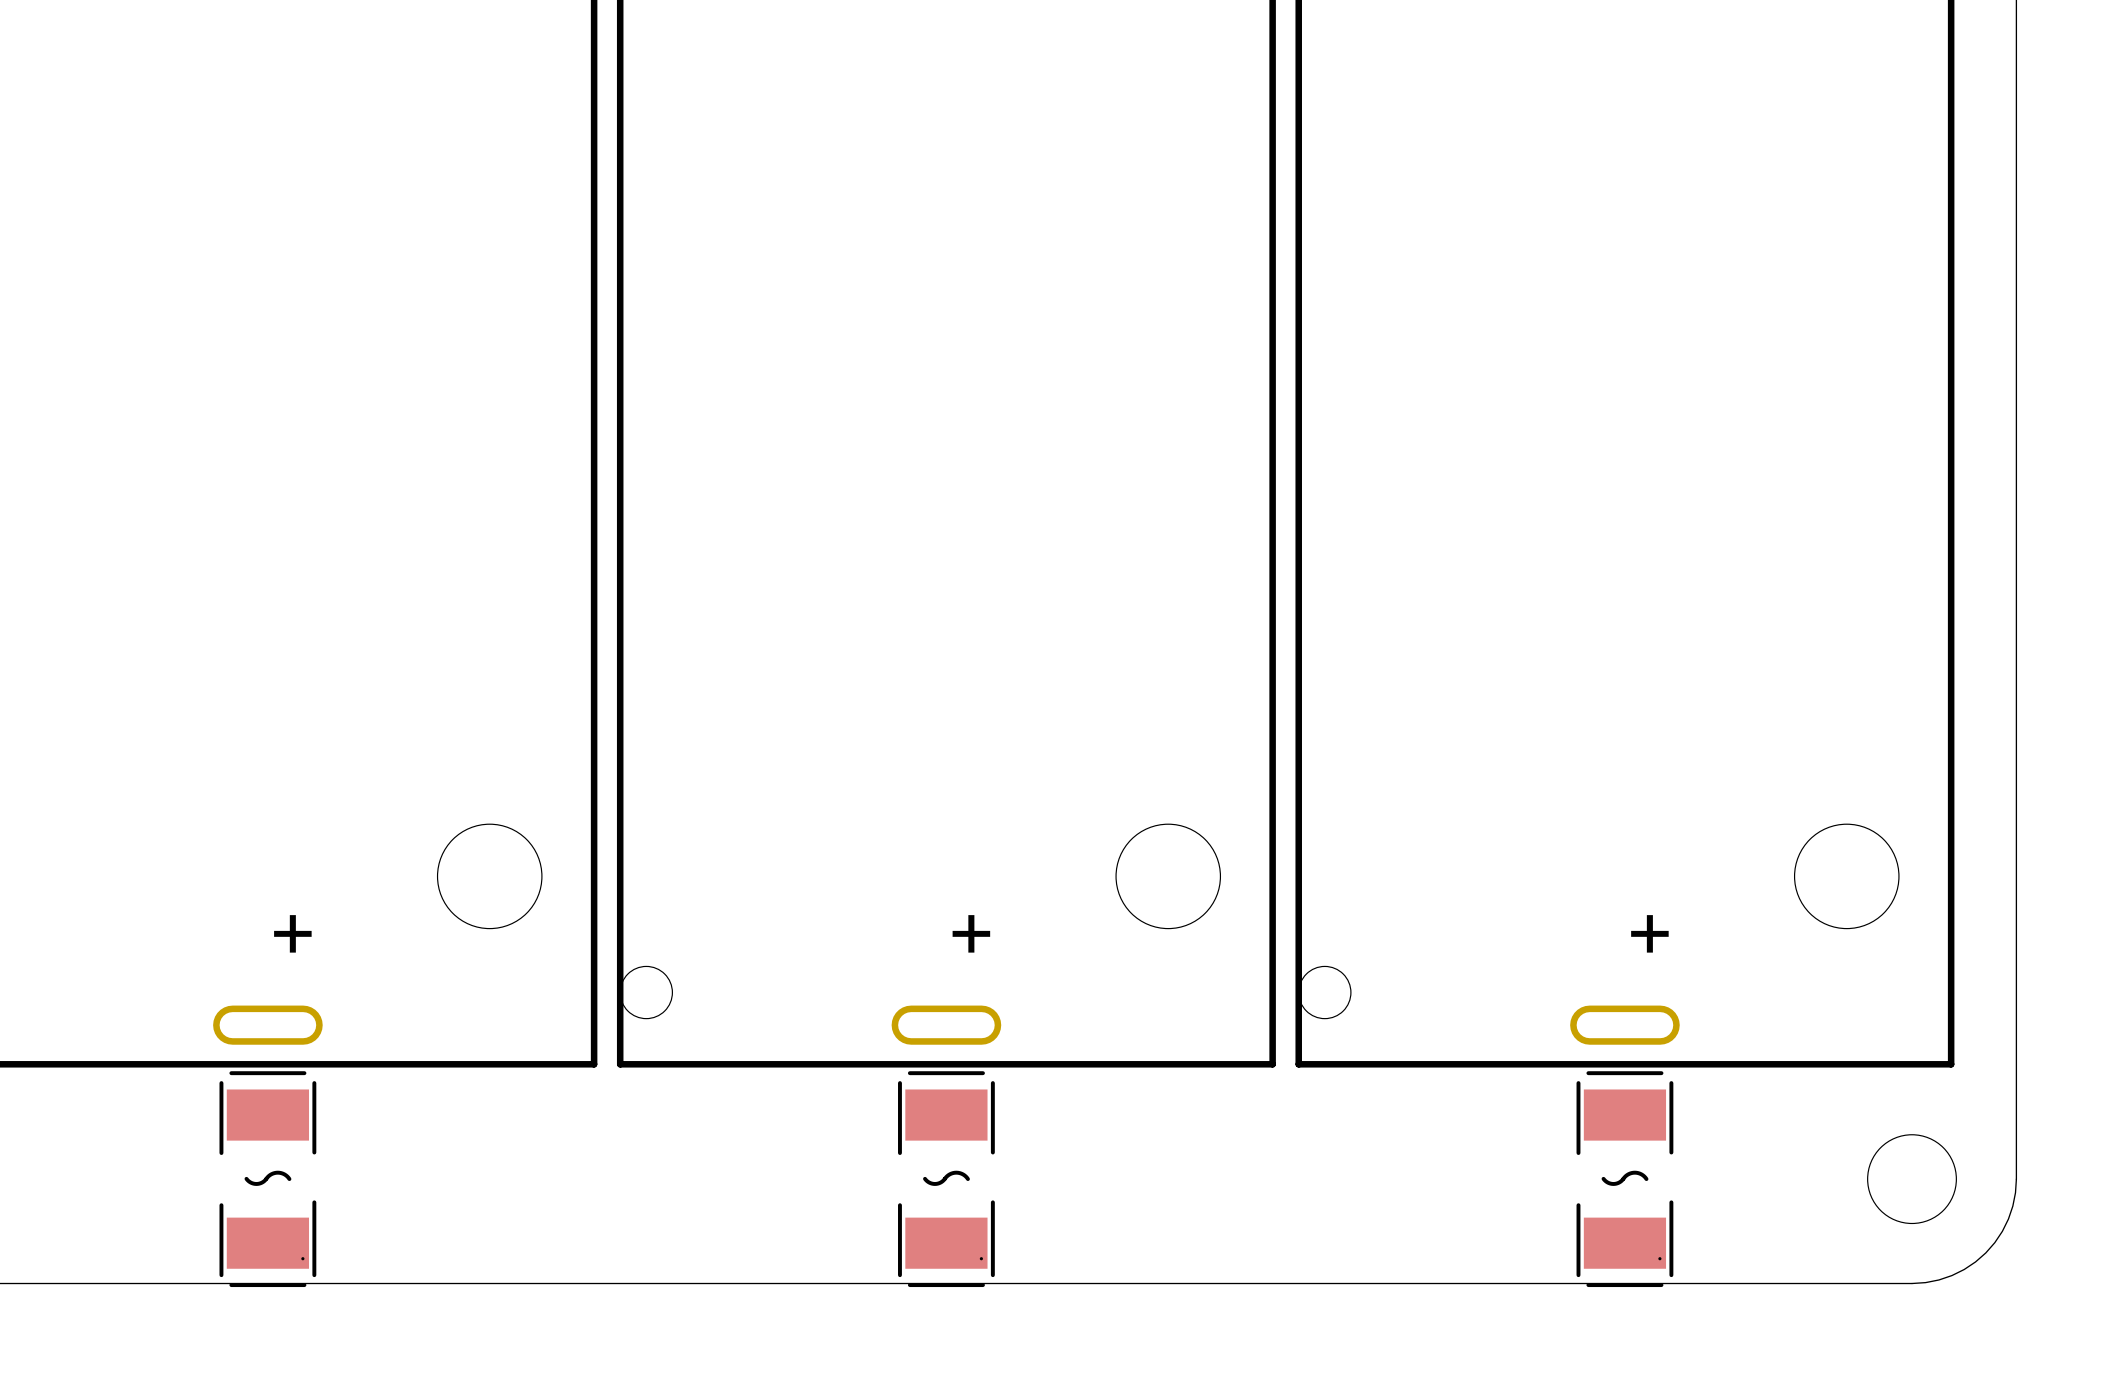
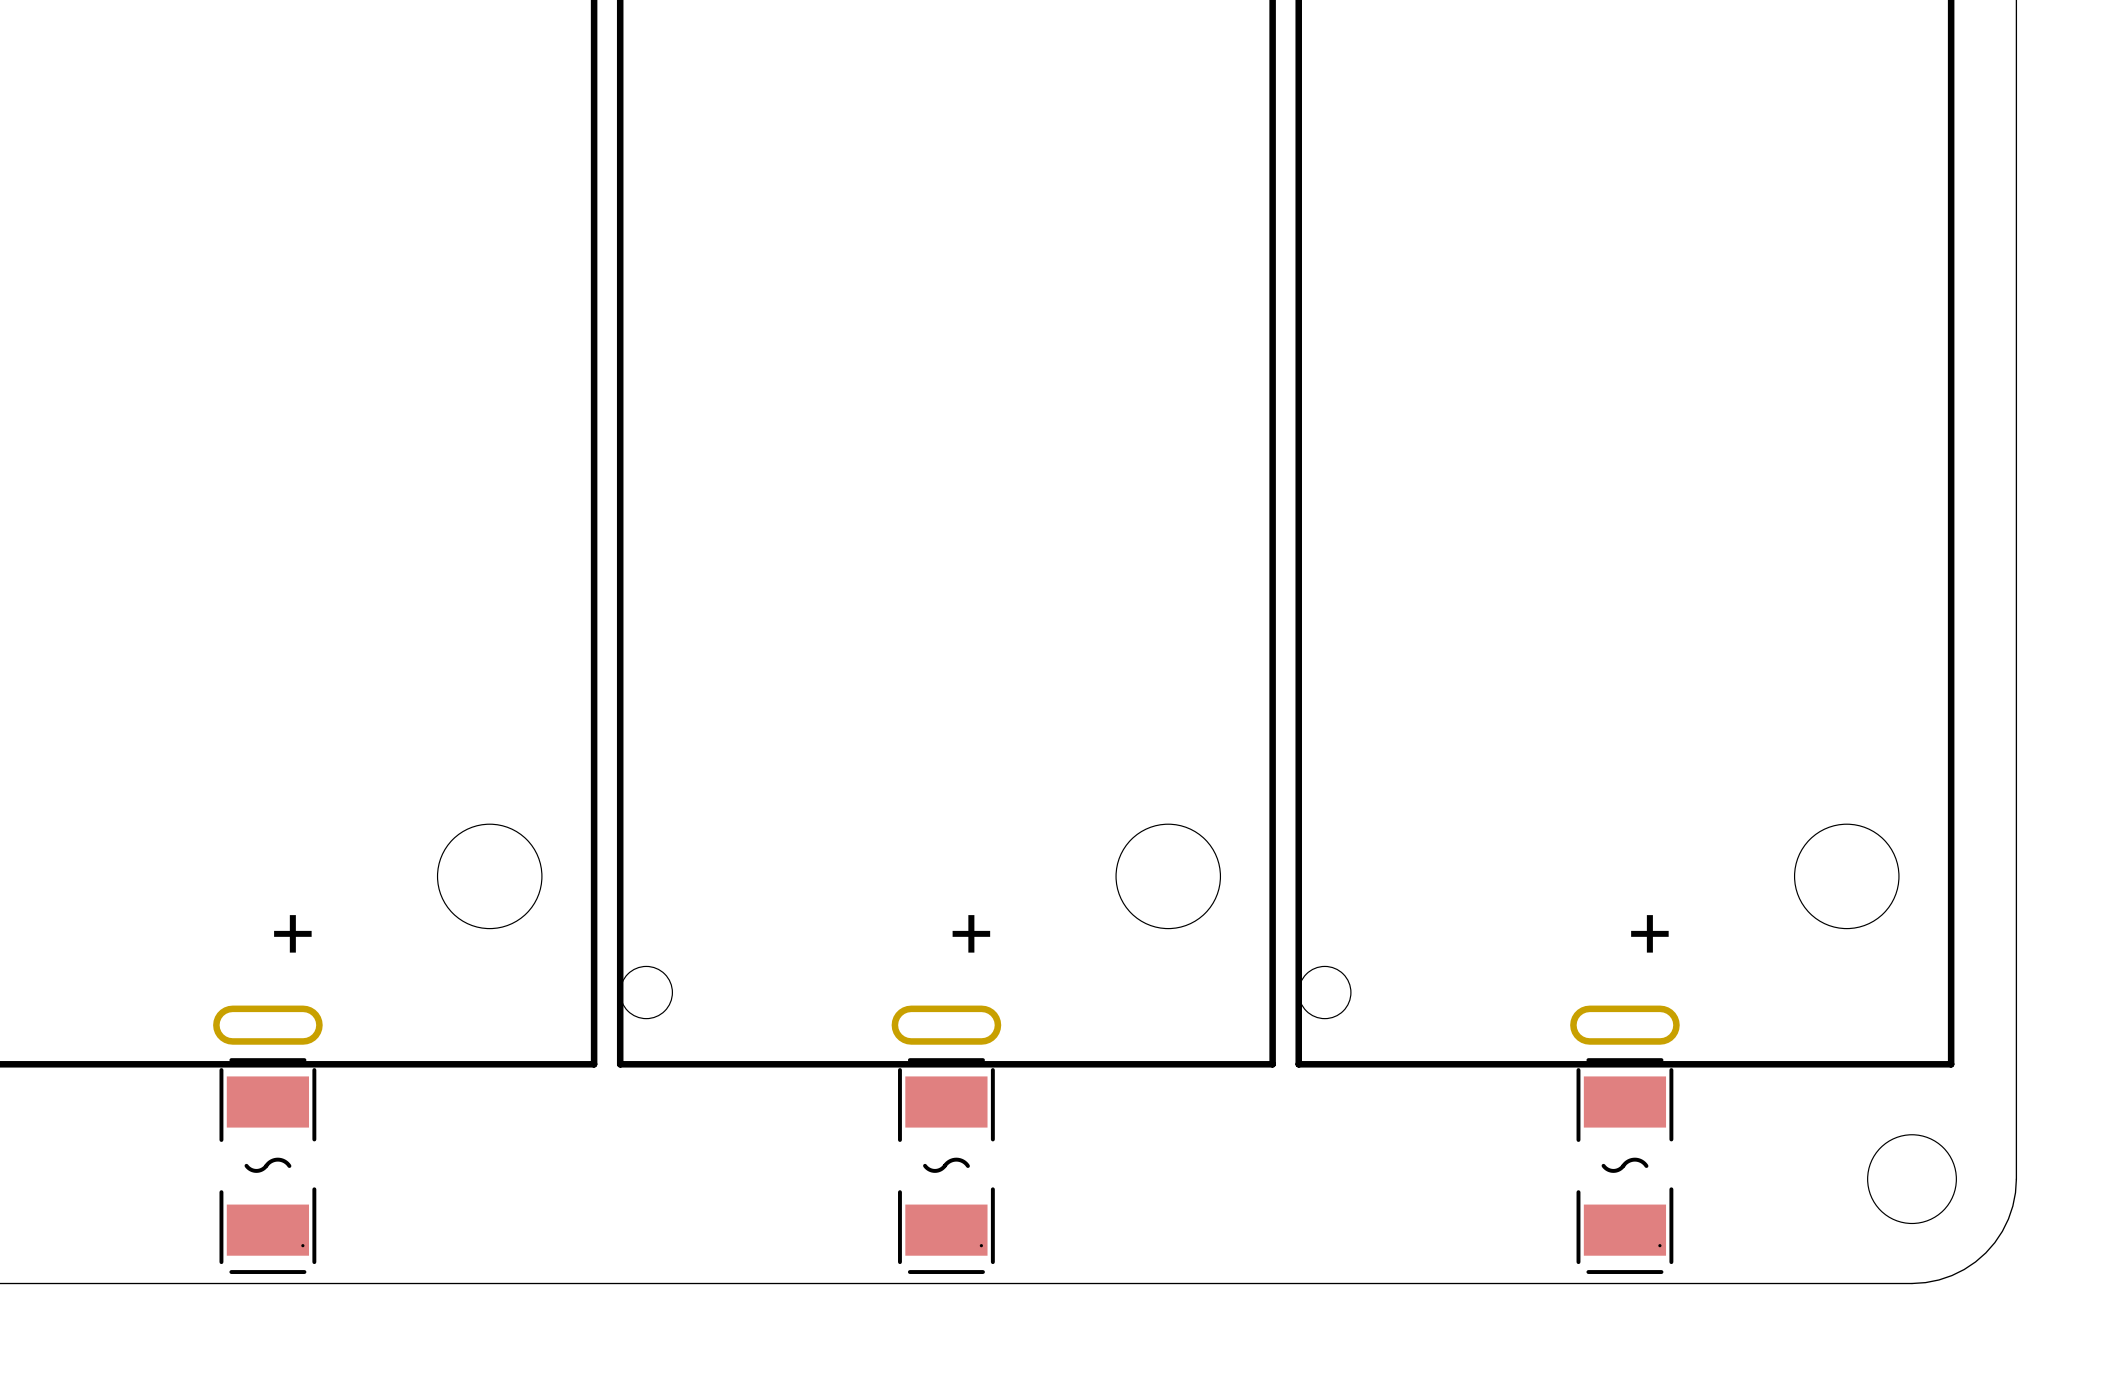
part position: (267, 1179) -> (267, 1166)
part position: (946, 1179) -> (946, 1166)
part position: (1624, 1179) -> (1624, 1166)

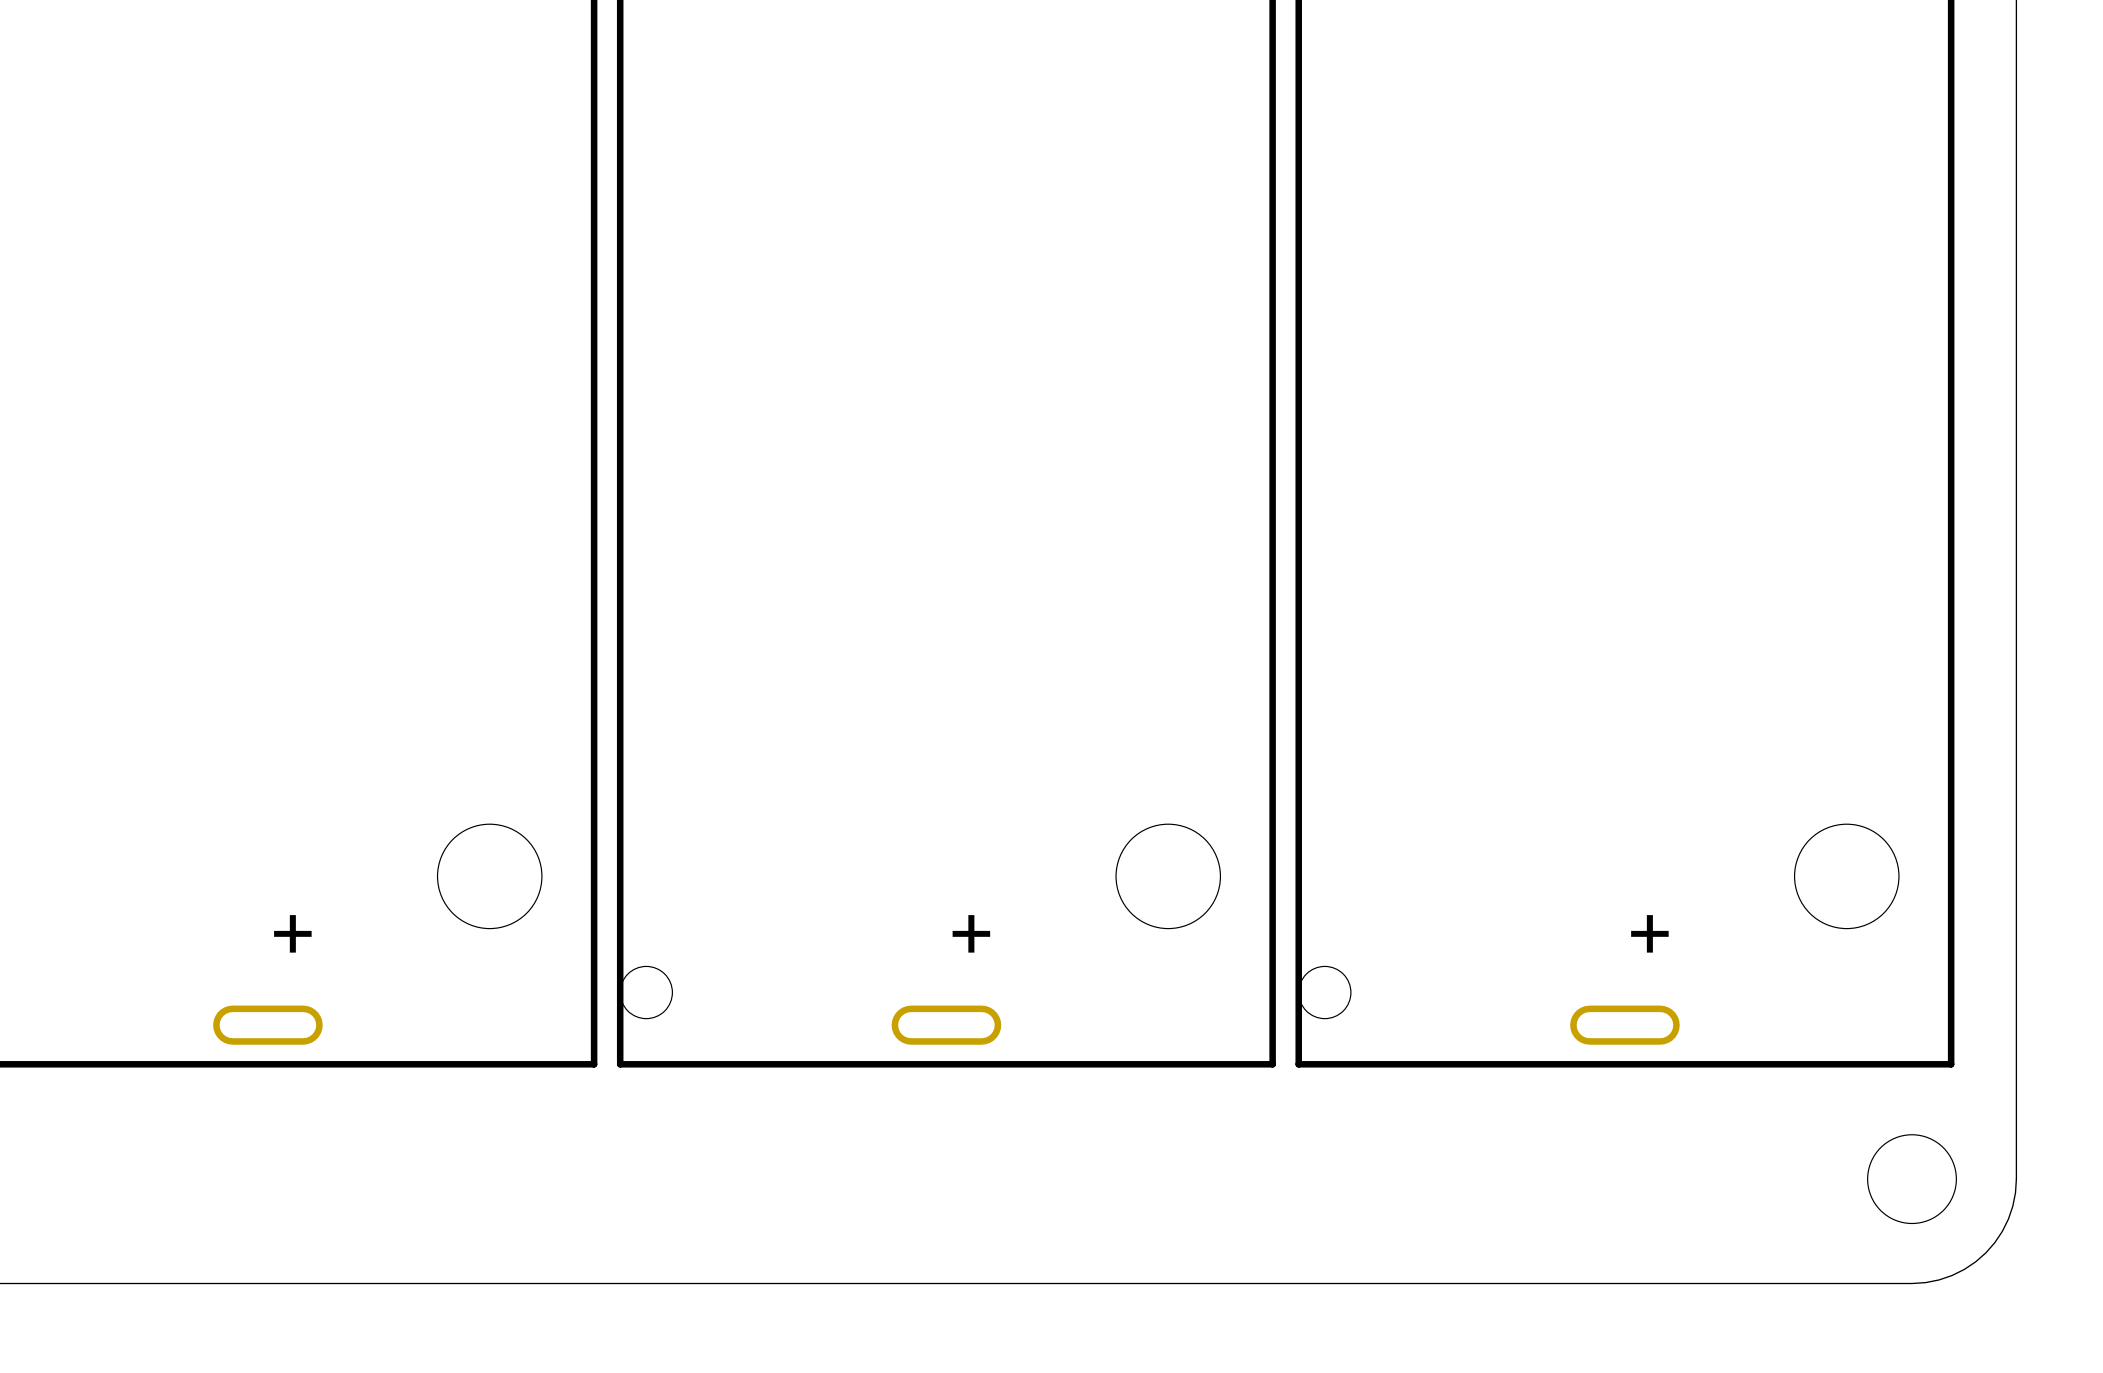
part: (267, 1166) -> none
part: (946, 1166) -> none
part: (1624, 1166) -> none

